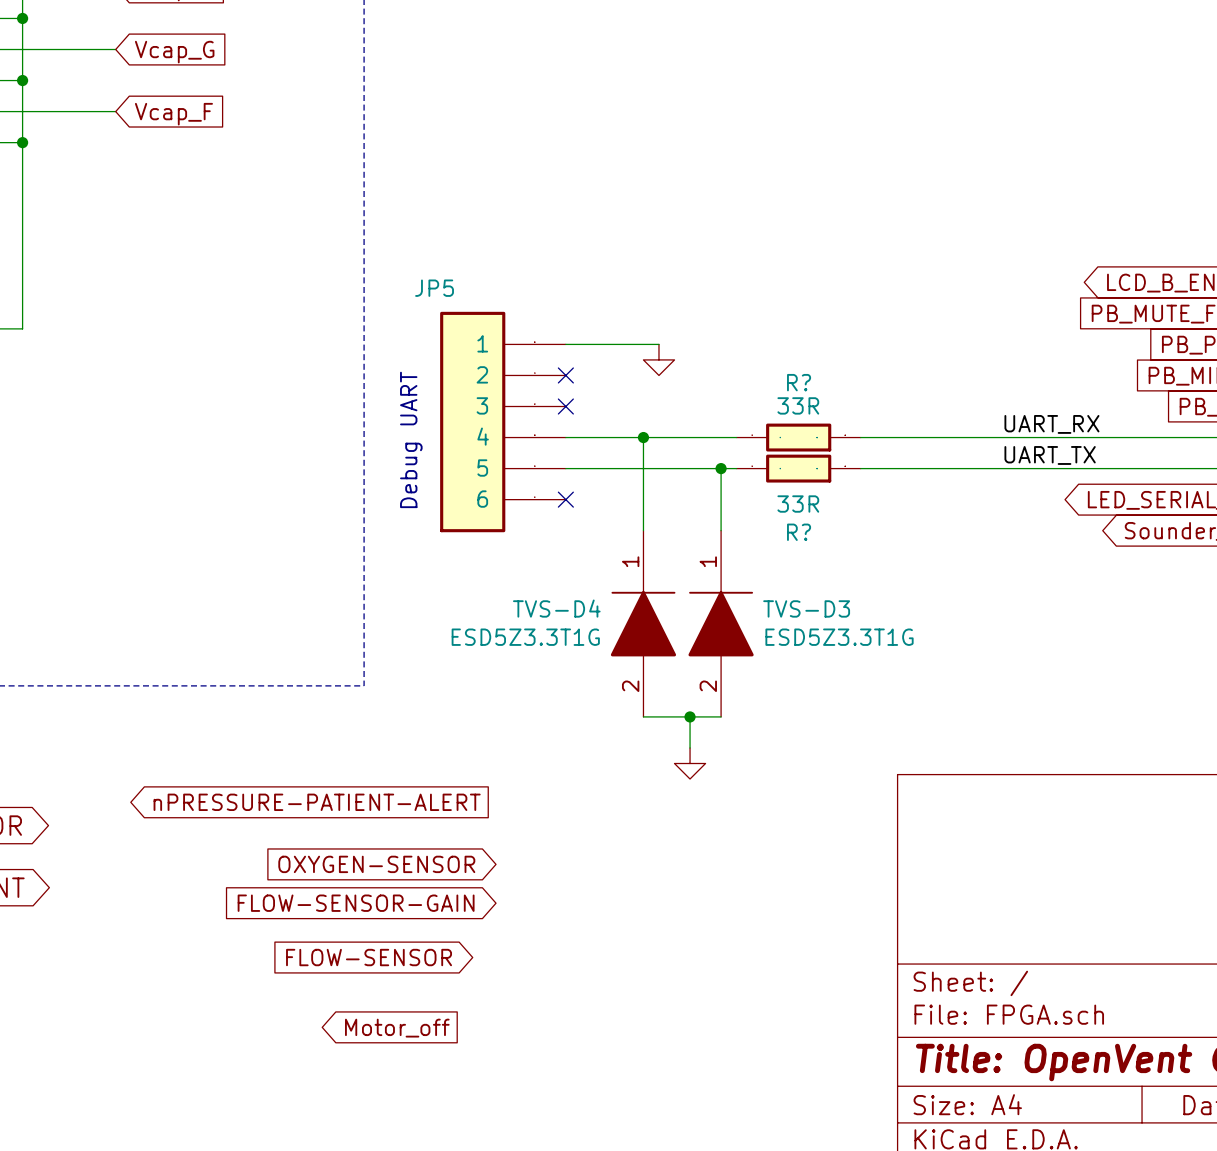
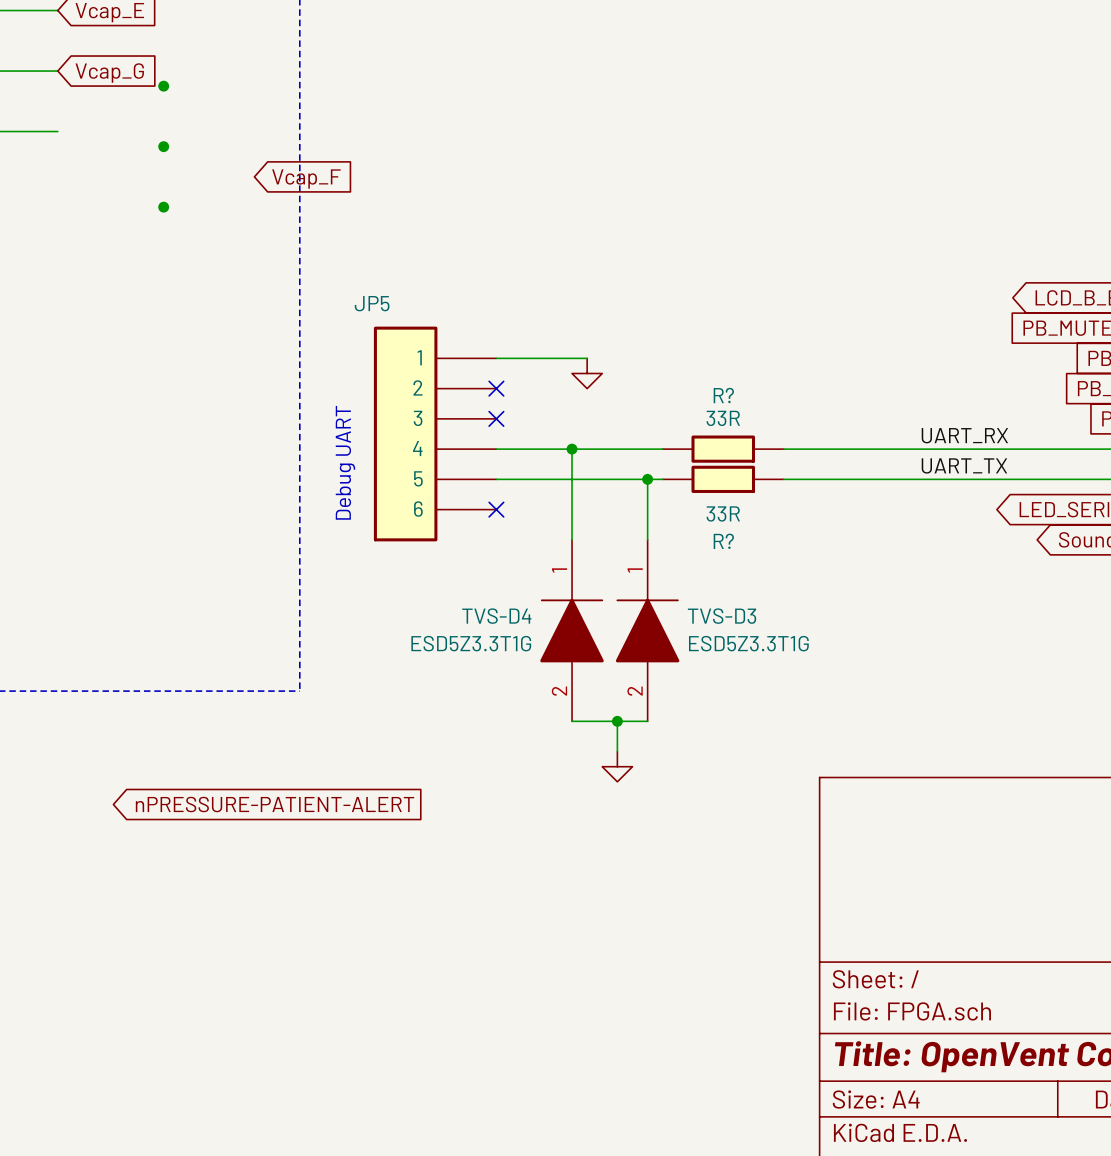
junction: none -> (163, 86)
global label position: Vcap_F (173, 114) -> Vcap_F (306, 178)
junction: none -> (163, 146)
junction: none -> (163, 207)
global label: OXYGEN-SENSOR (376, 864) -> none
global label: FLOW-SENSOR-GAIN (356, 903) -> none
global label: FLOW-SENSOR (369, 957) -> none
global label: Motor_off (397, 1028) -> none

